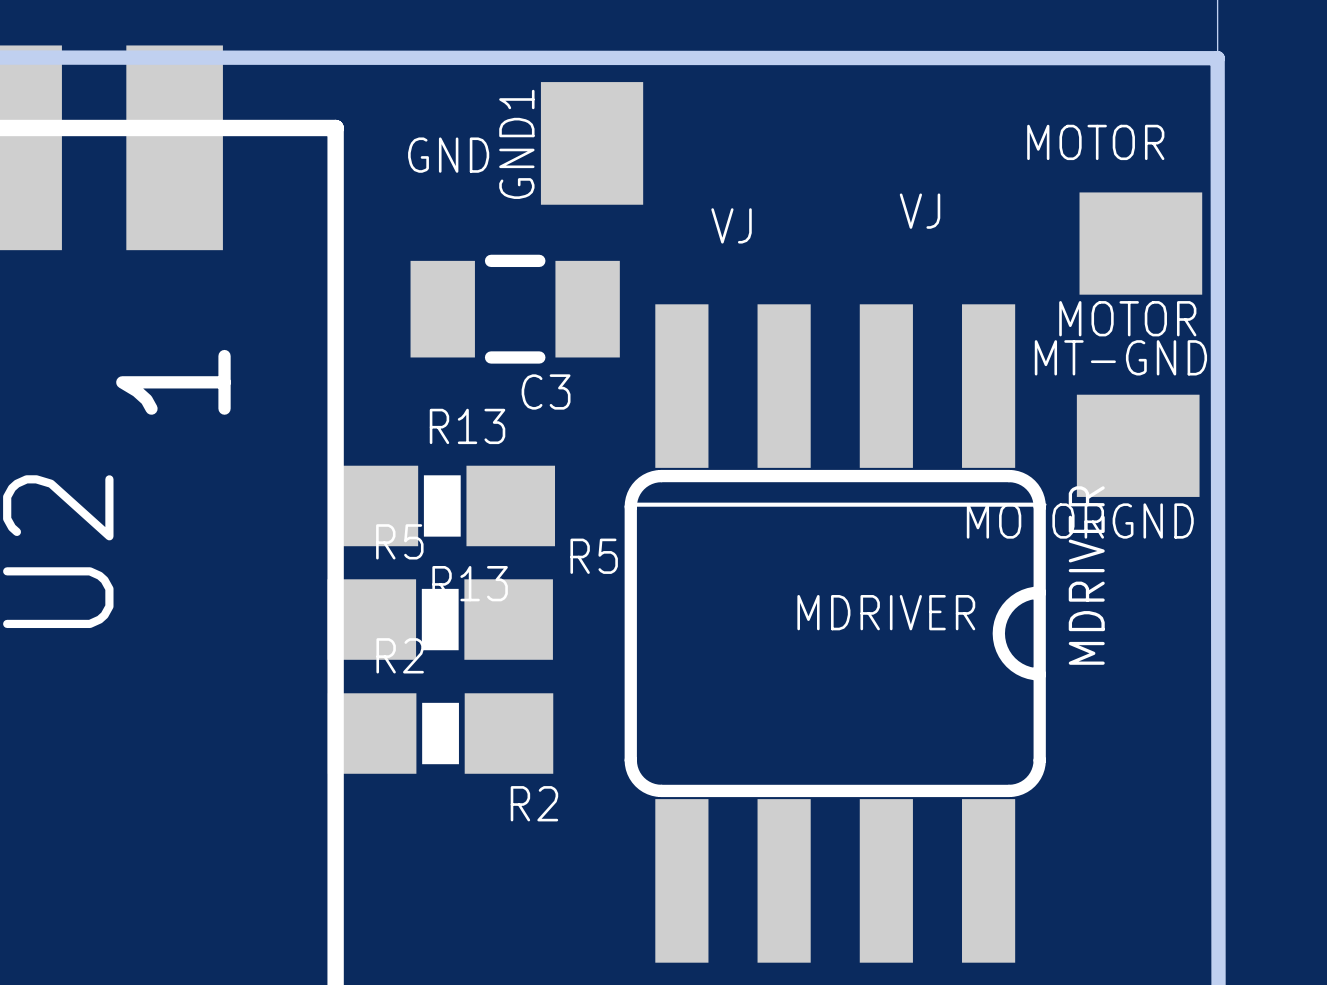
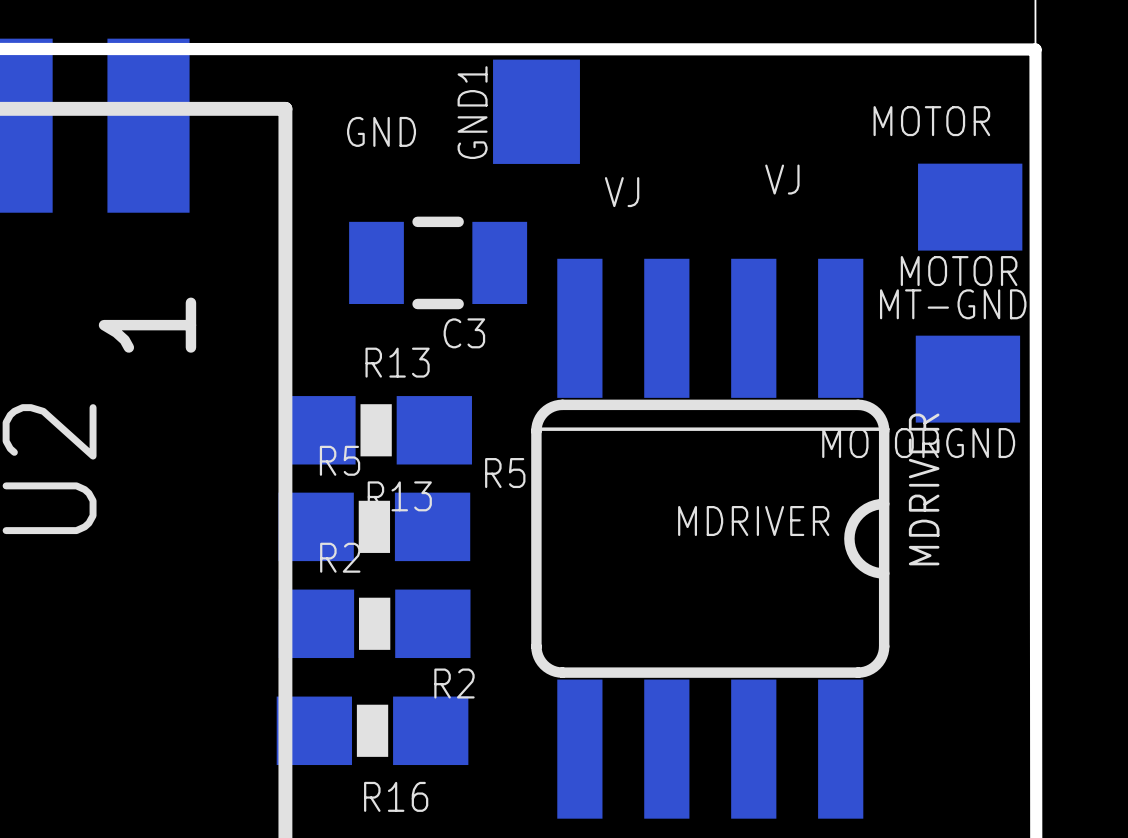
GND1 position: (592, 143) -> (536, 111)
R16: none -> (372, 730)

